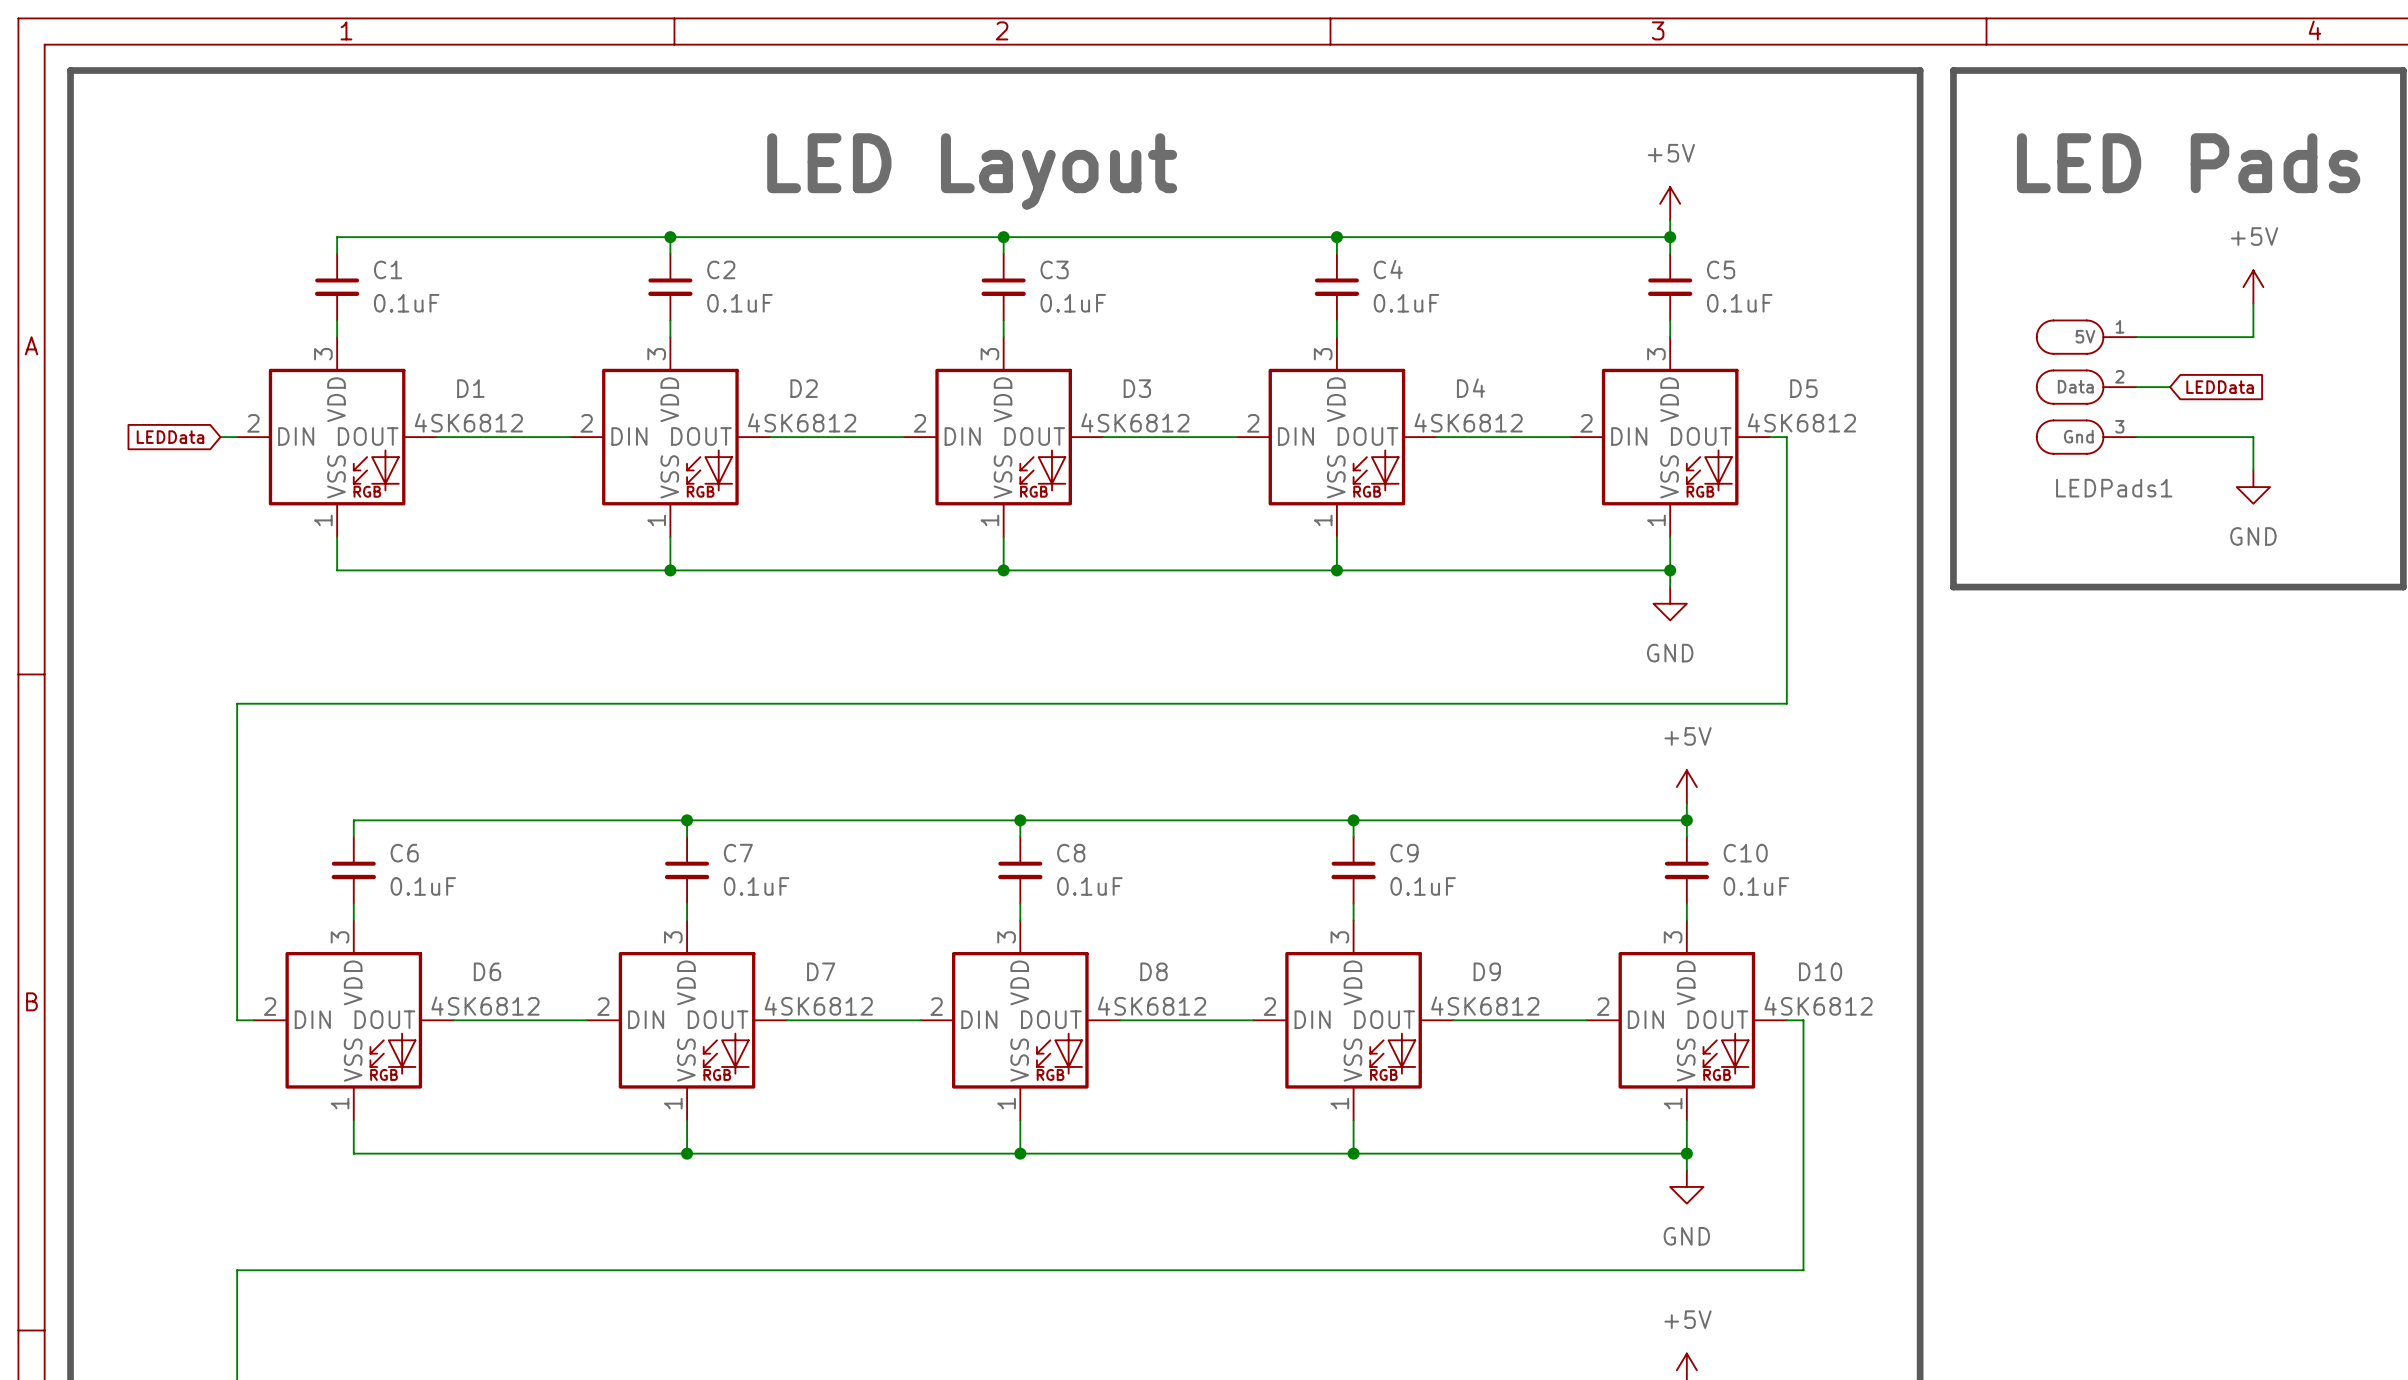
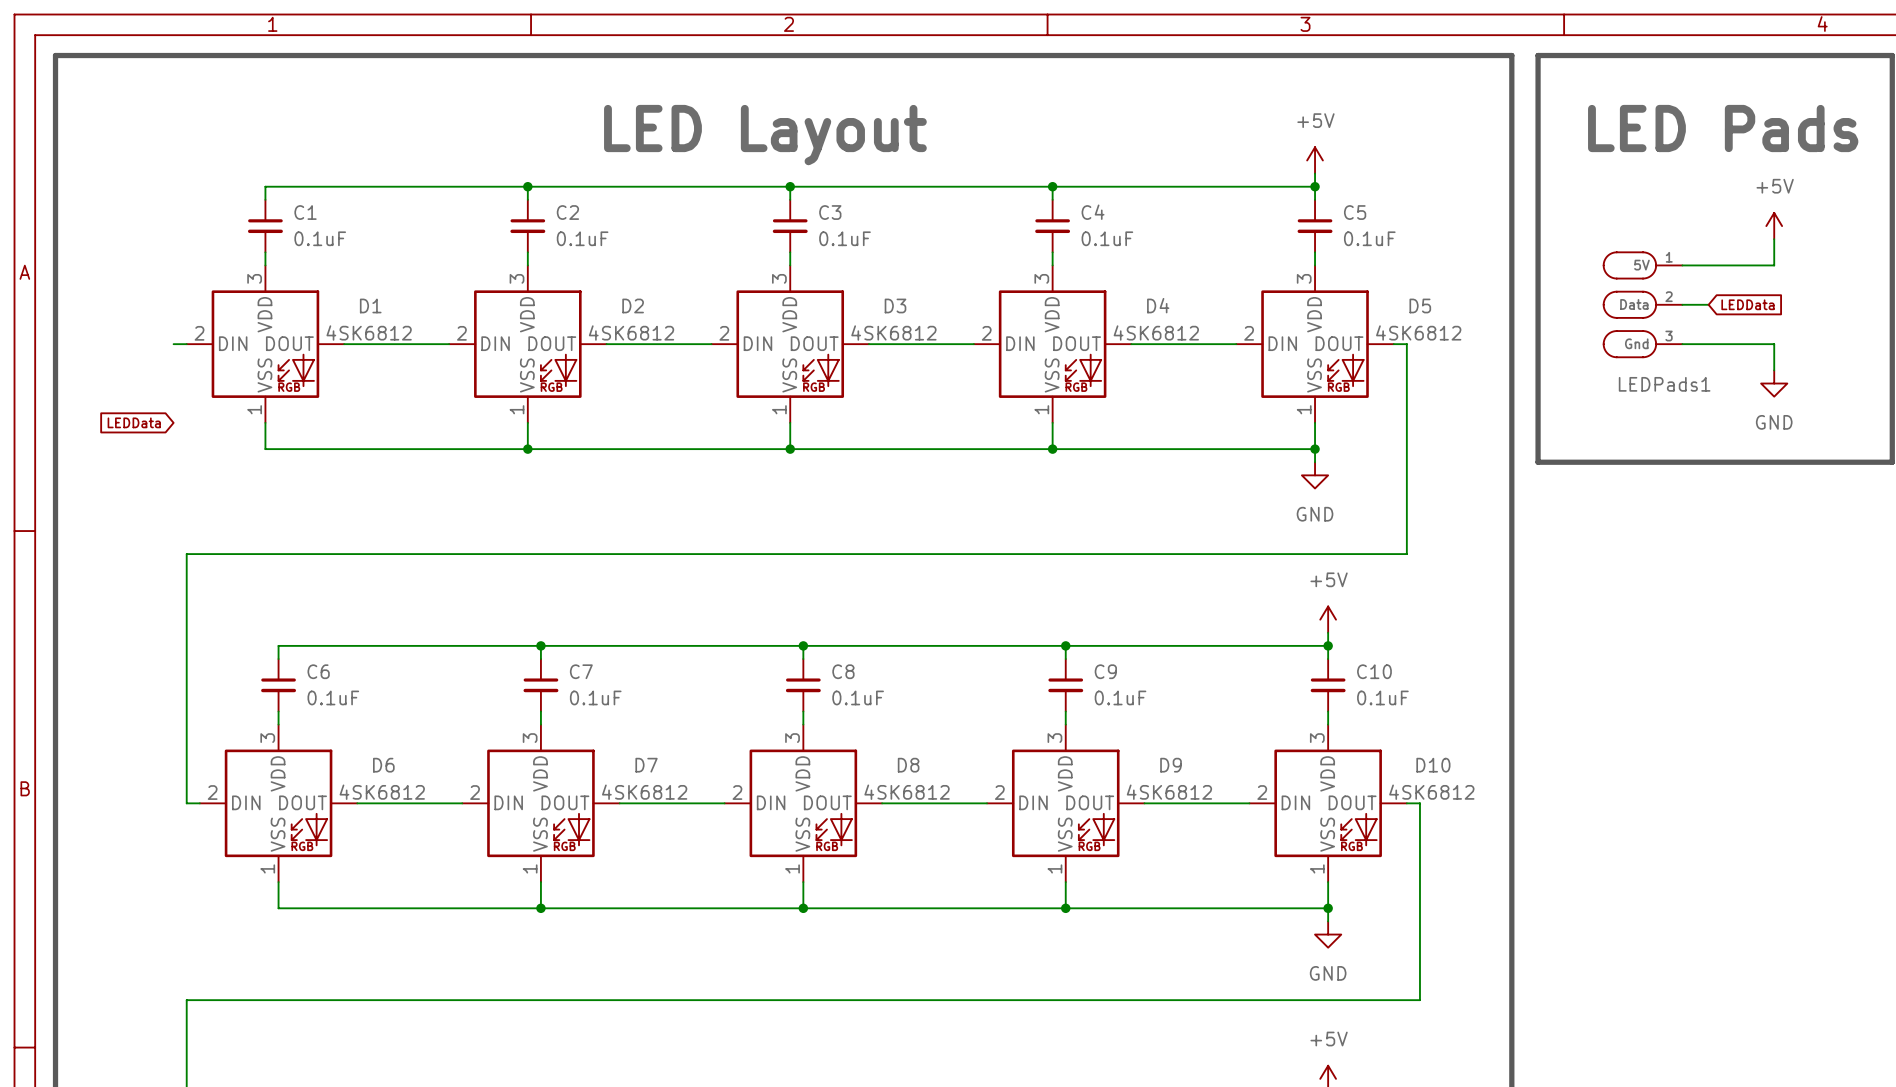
global label position: LEDData (170, 437) -> LEDData (134, 422)

